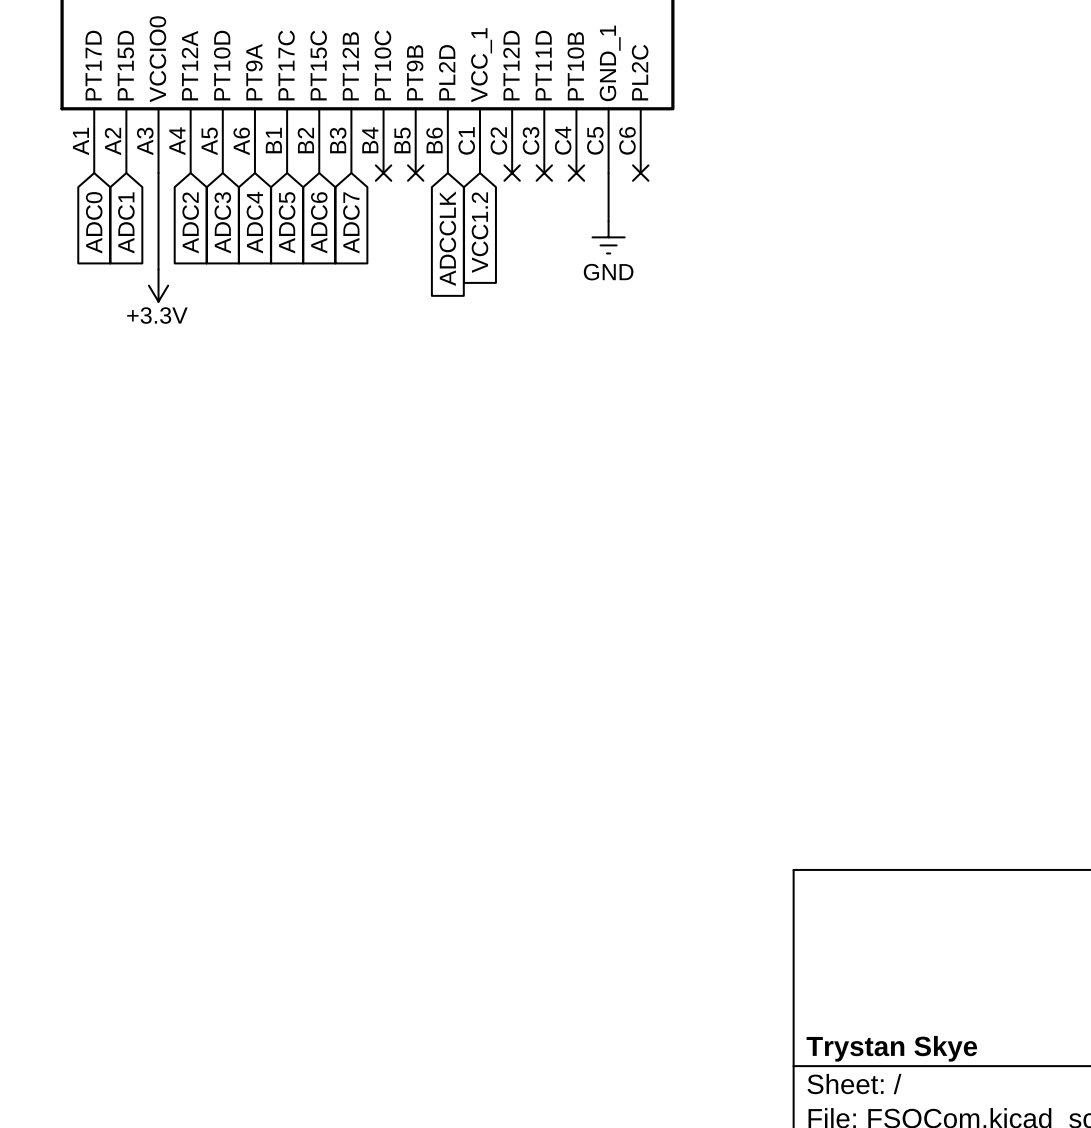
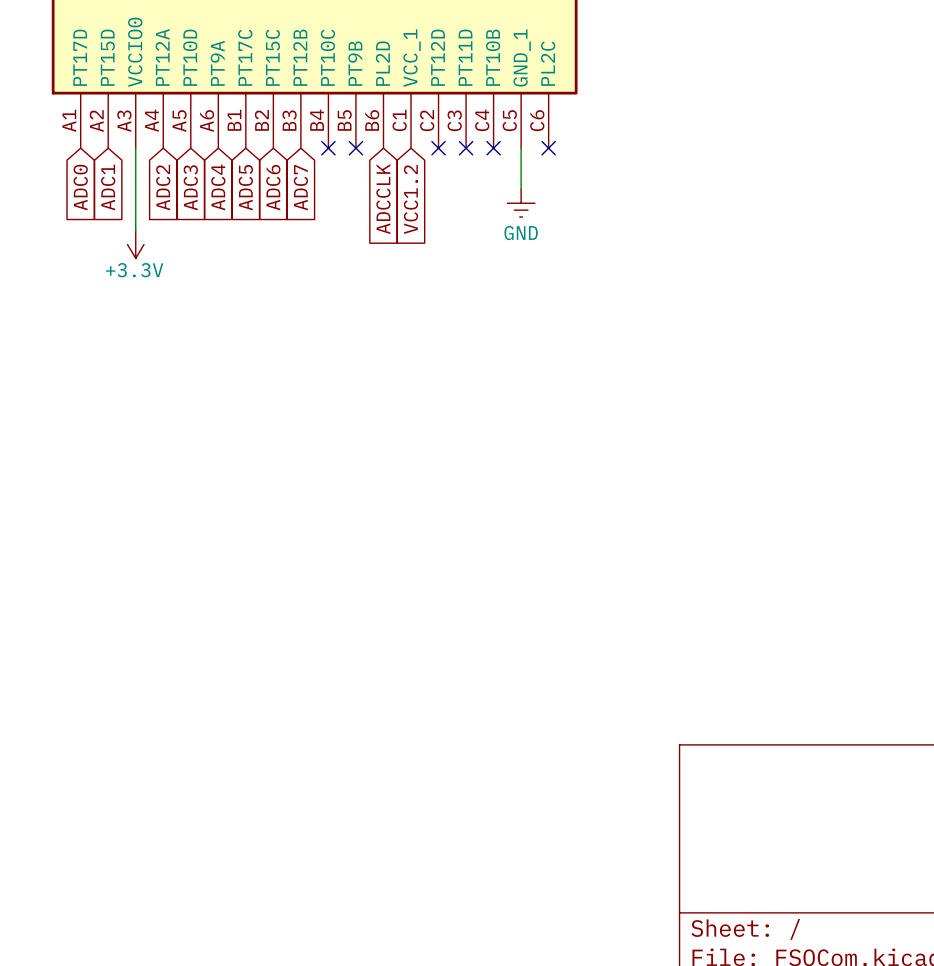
title block: Trystan Skye (891, 1048) -> none

